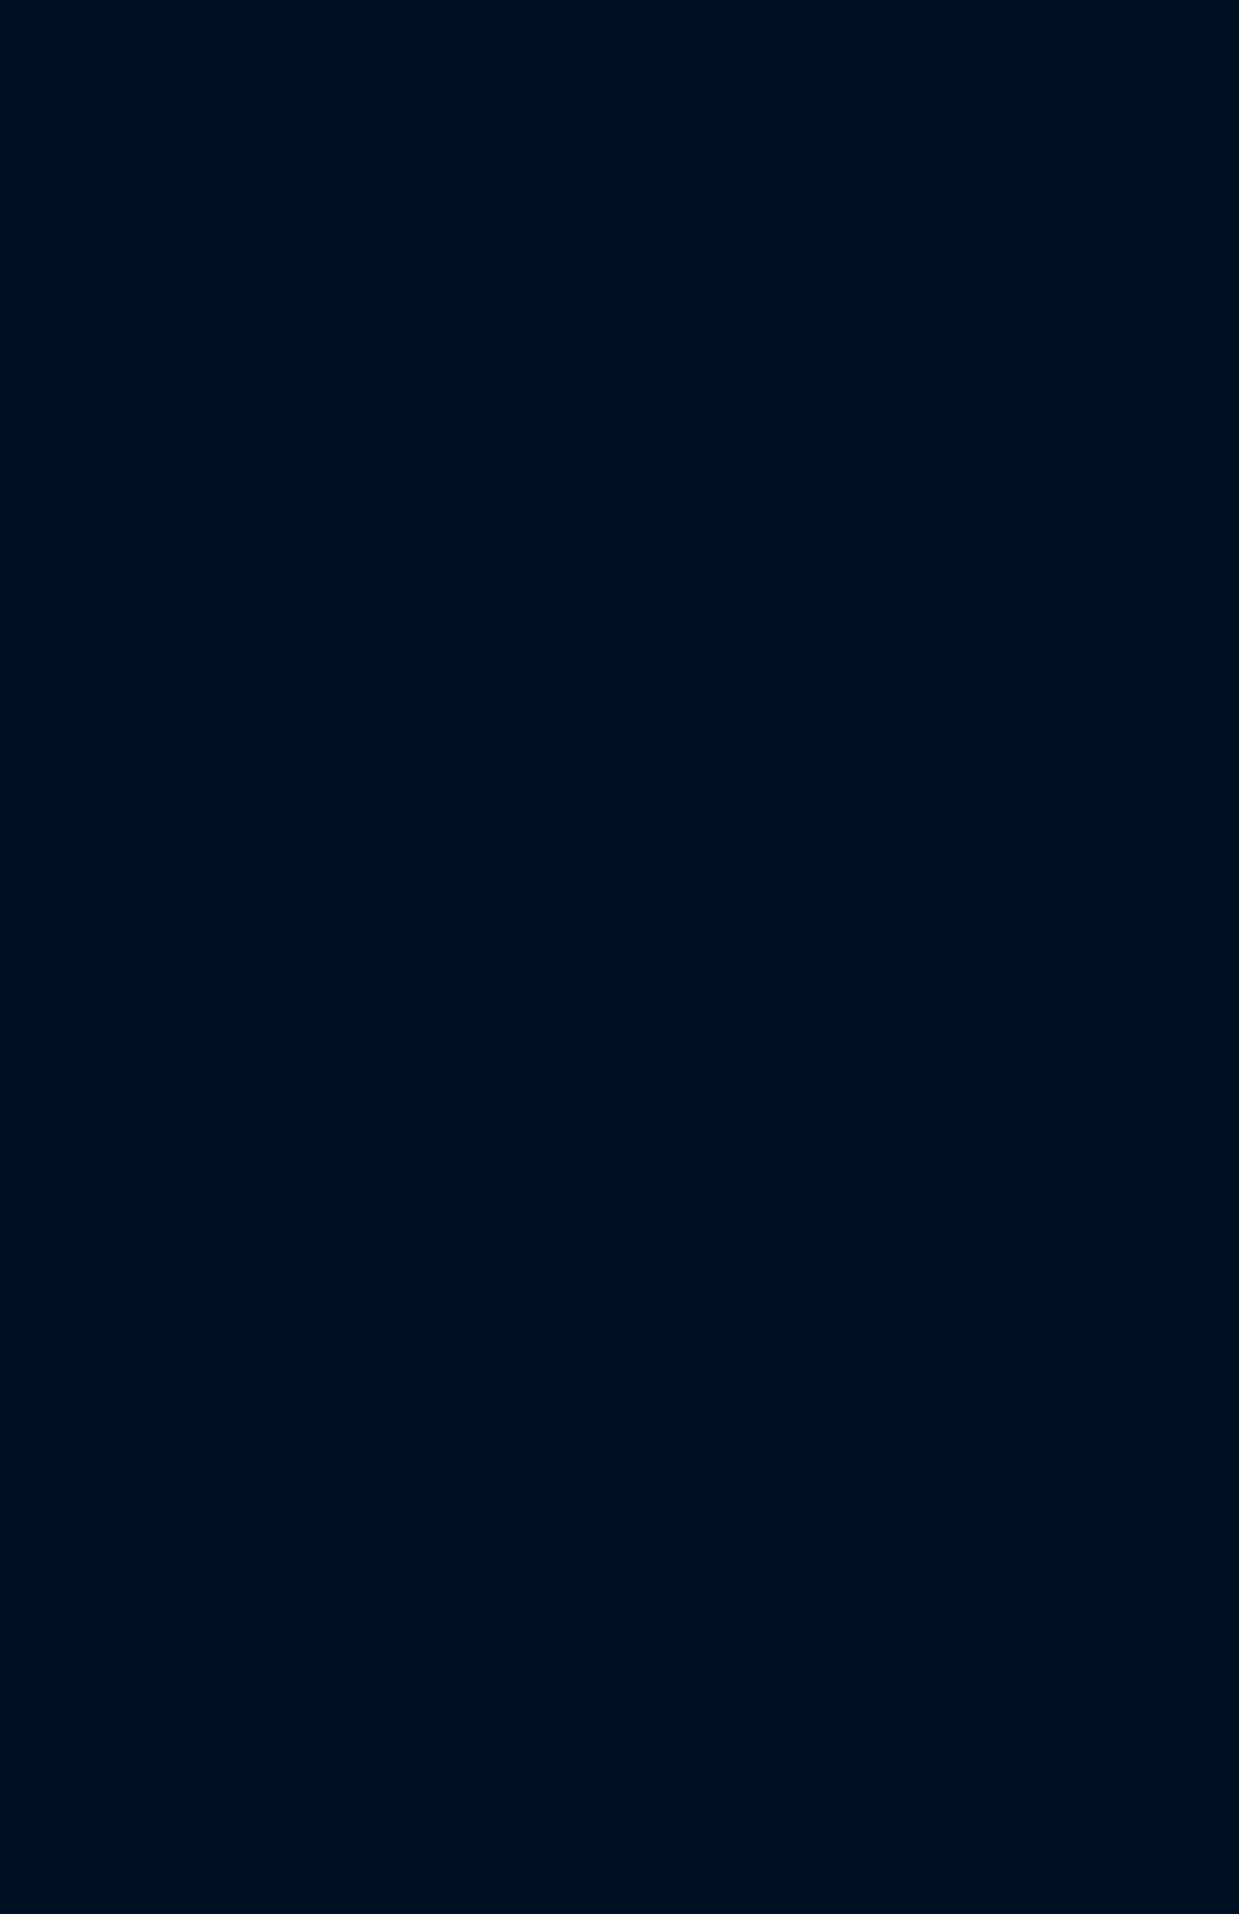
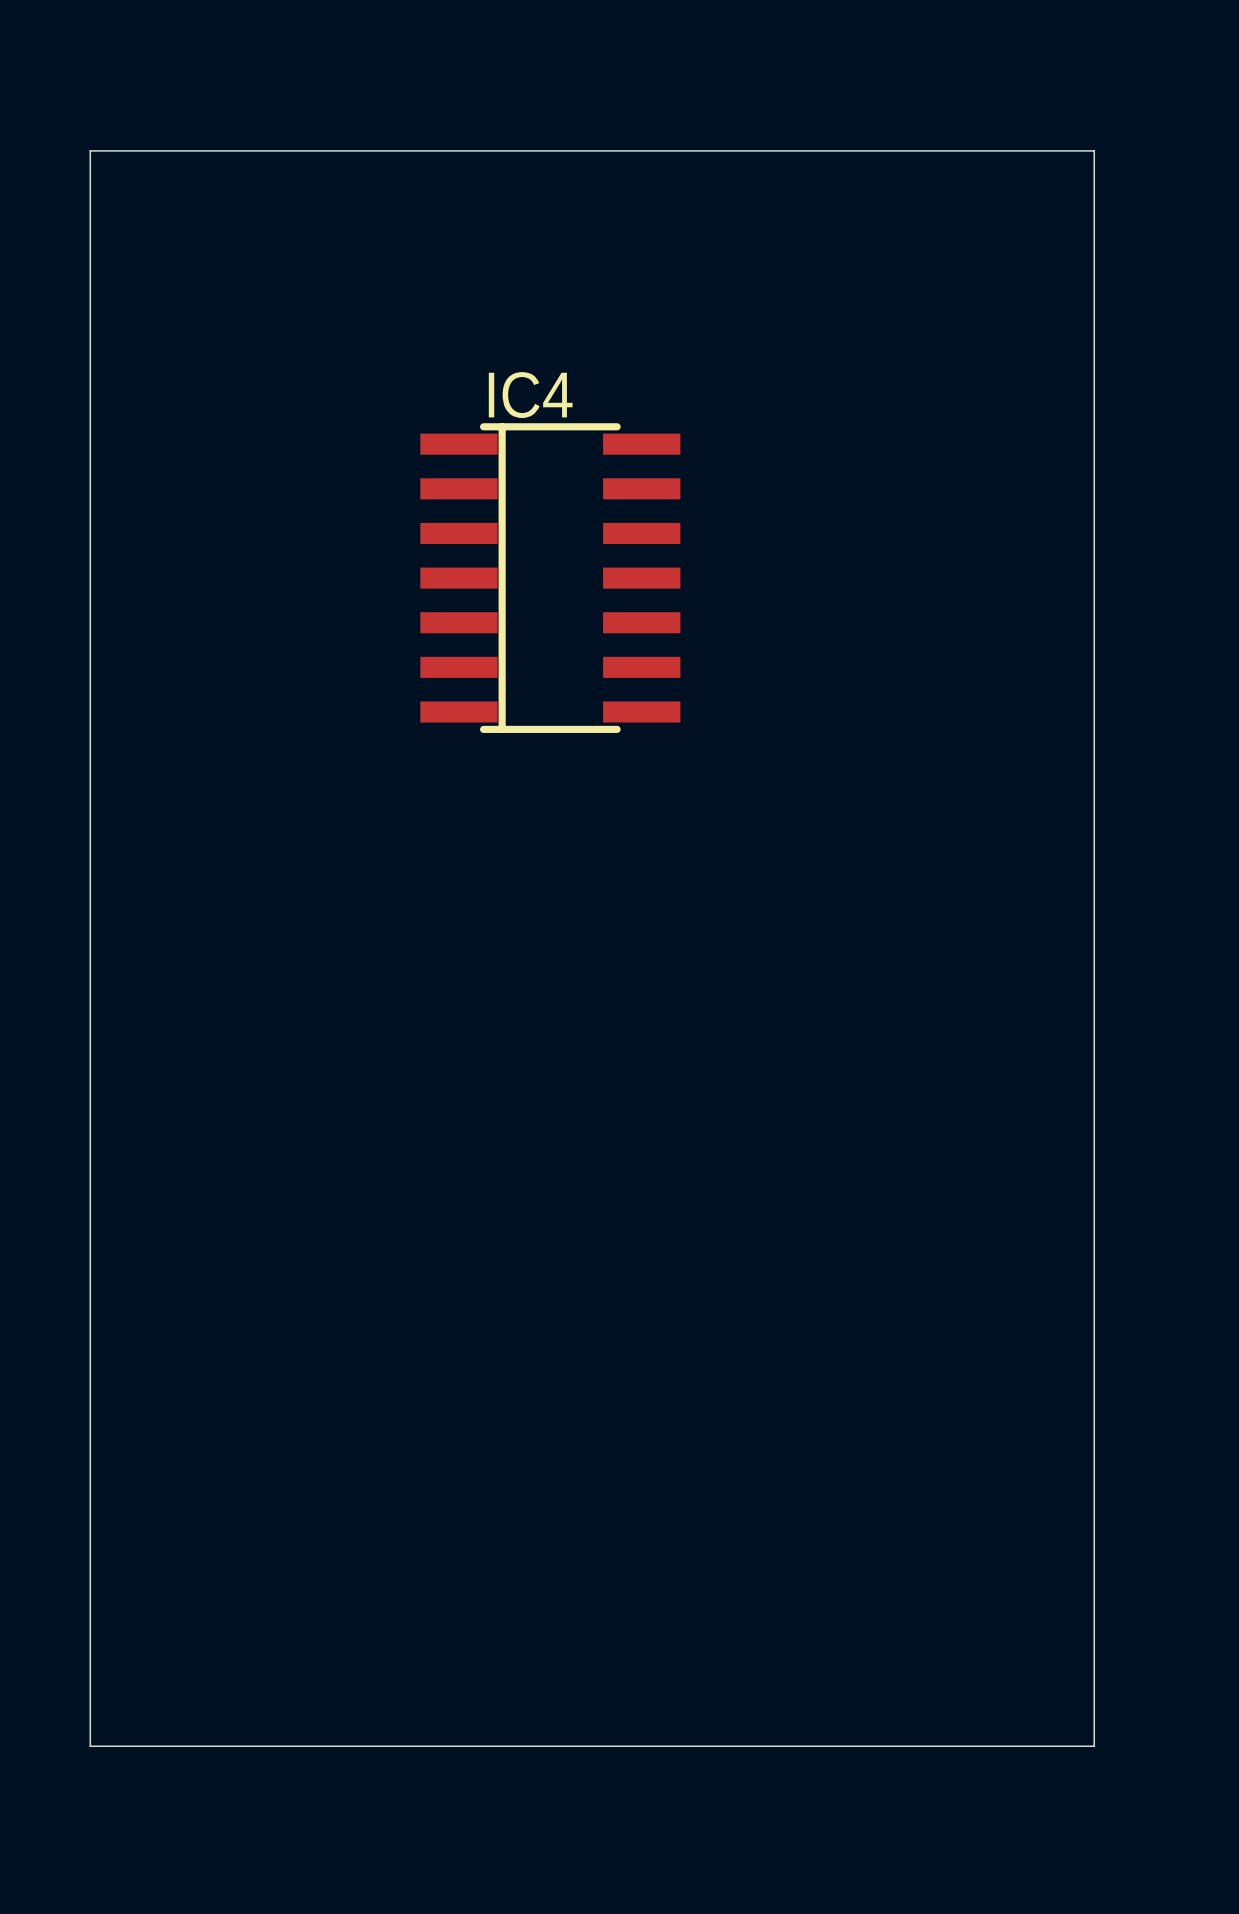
board edge: none -> (90, 150) (90, 1746) (1094, 1746) (1094, 150) (90, 150)
IC4: none -> (550, 578)

